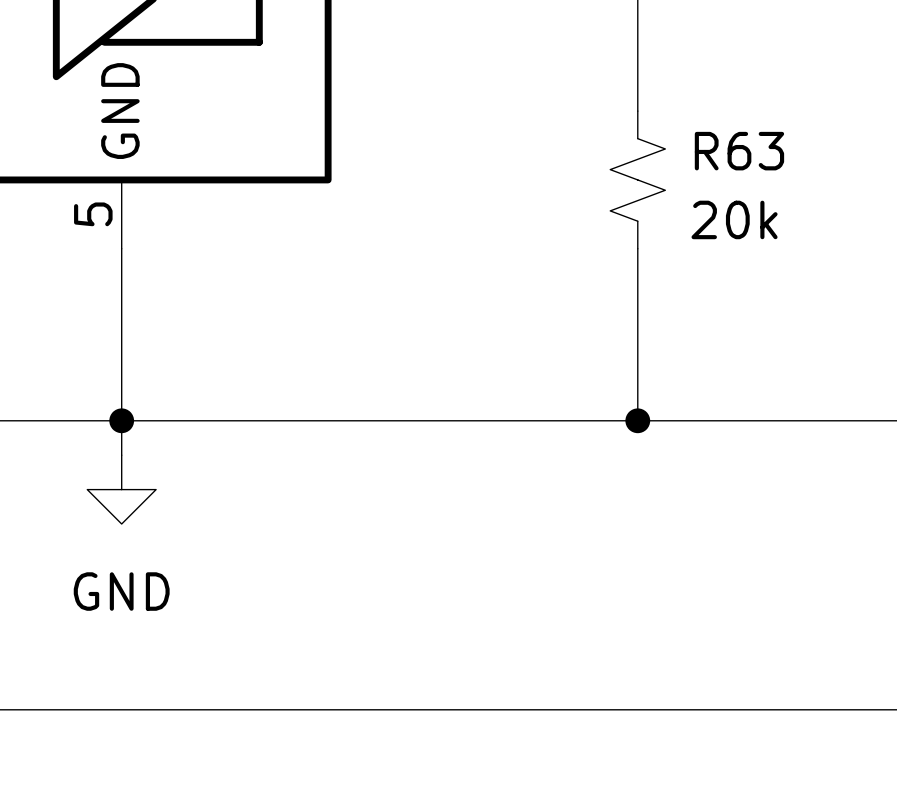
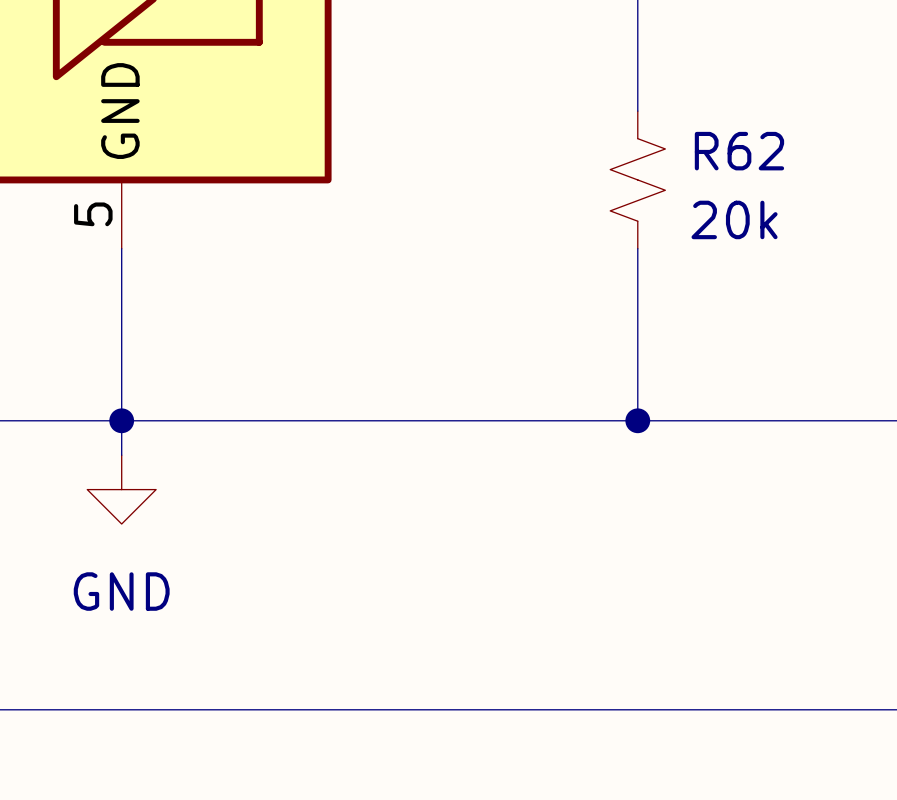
R63 name: R63 (739, 151) -> R62 (739, 151)

